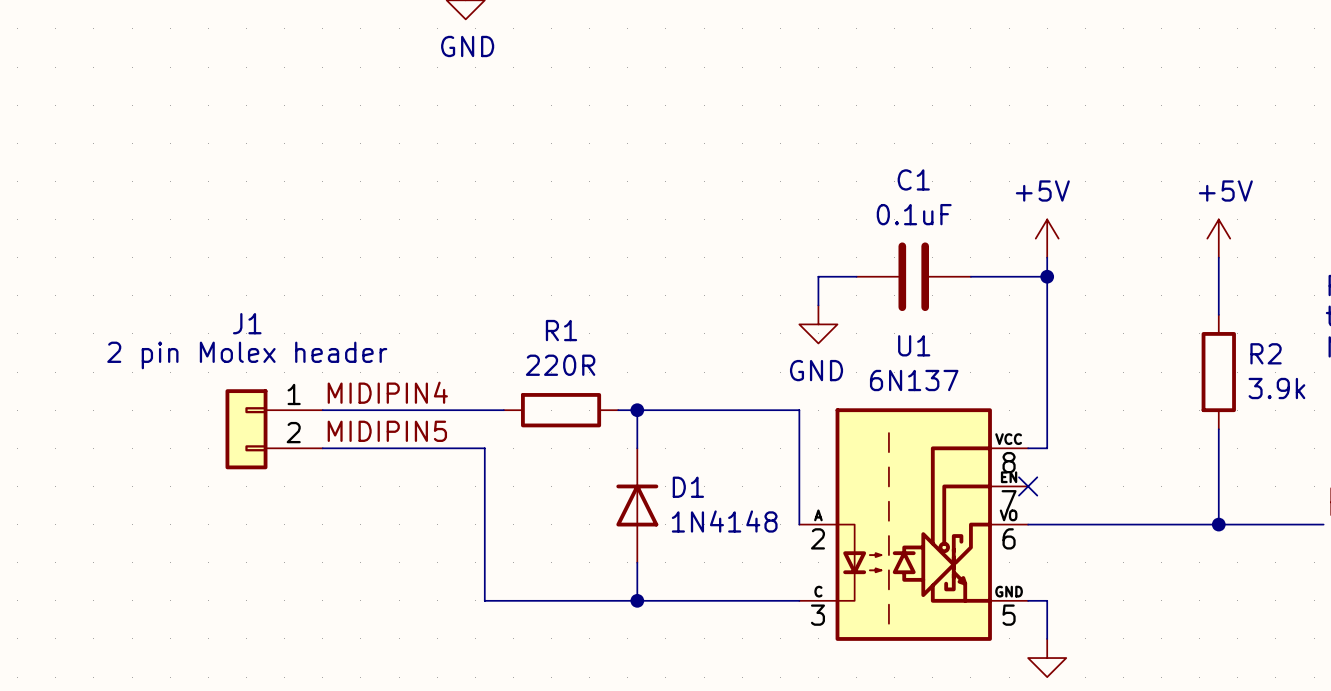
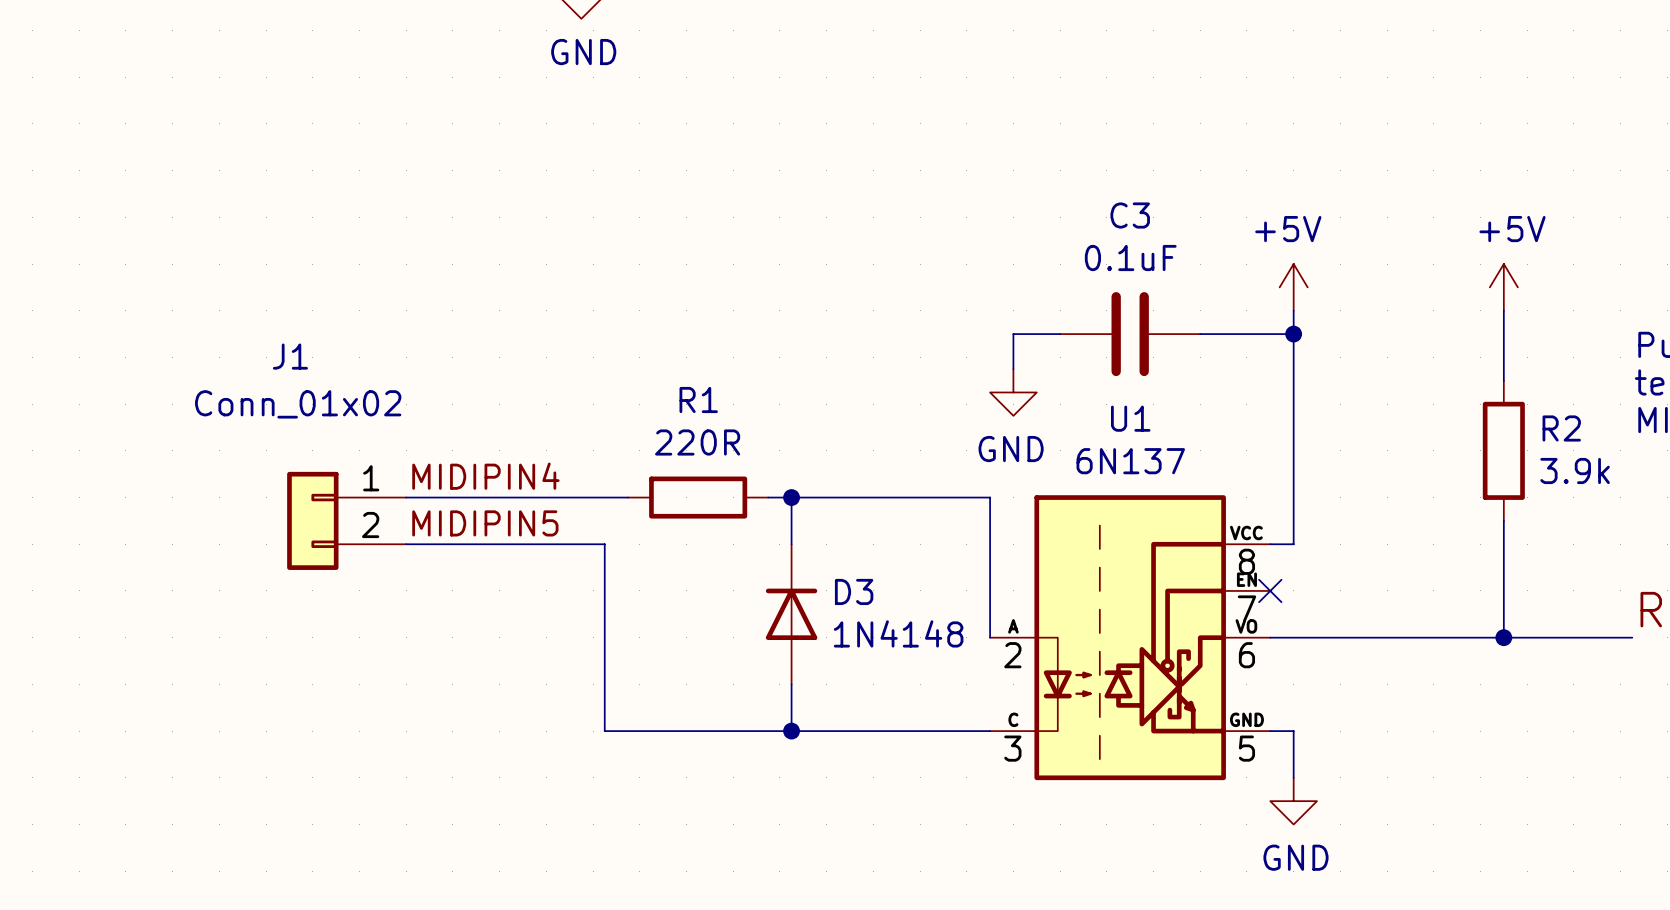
C1 name: C1 (913, 179) -> C3 (1130, 215)
J1 name position: J1 (247, 323) -> J1 (290, 356)
J1 value: 2 pin Molex header (247, 355) -> Conn_01x02 (298, 404)
D1 name: D1 (688, 487) -> D3 (854, 591)

